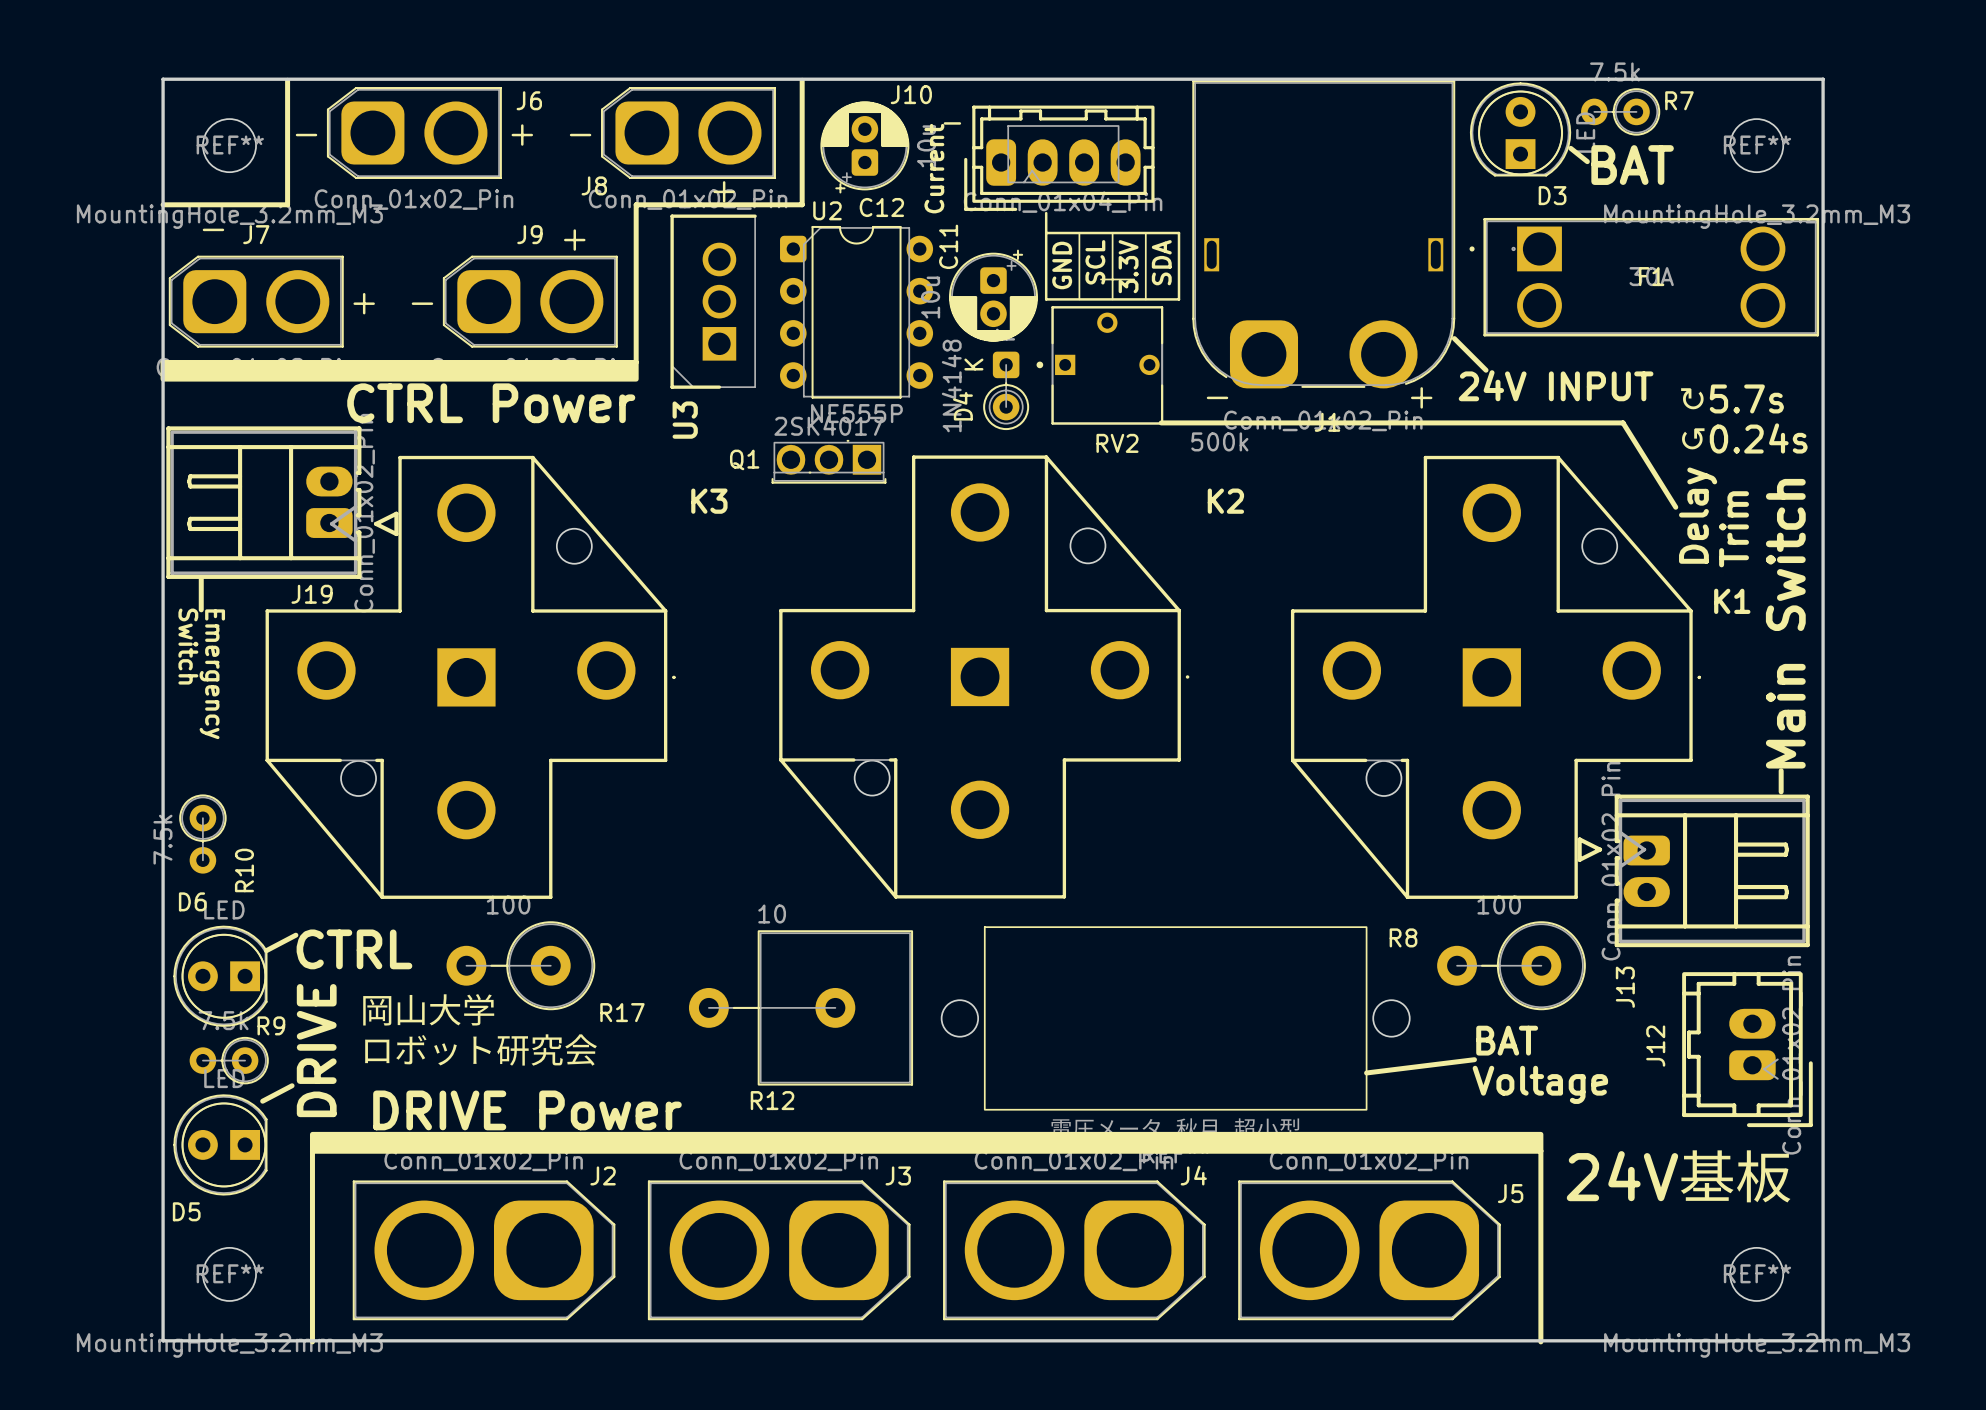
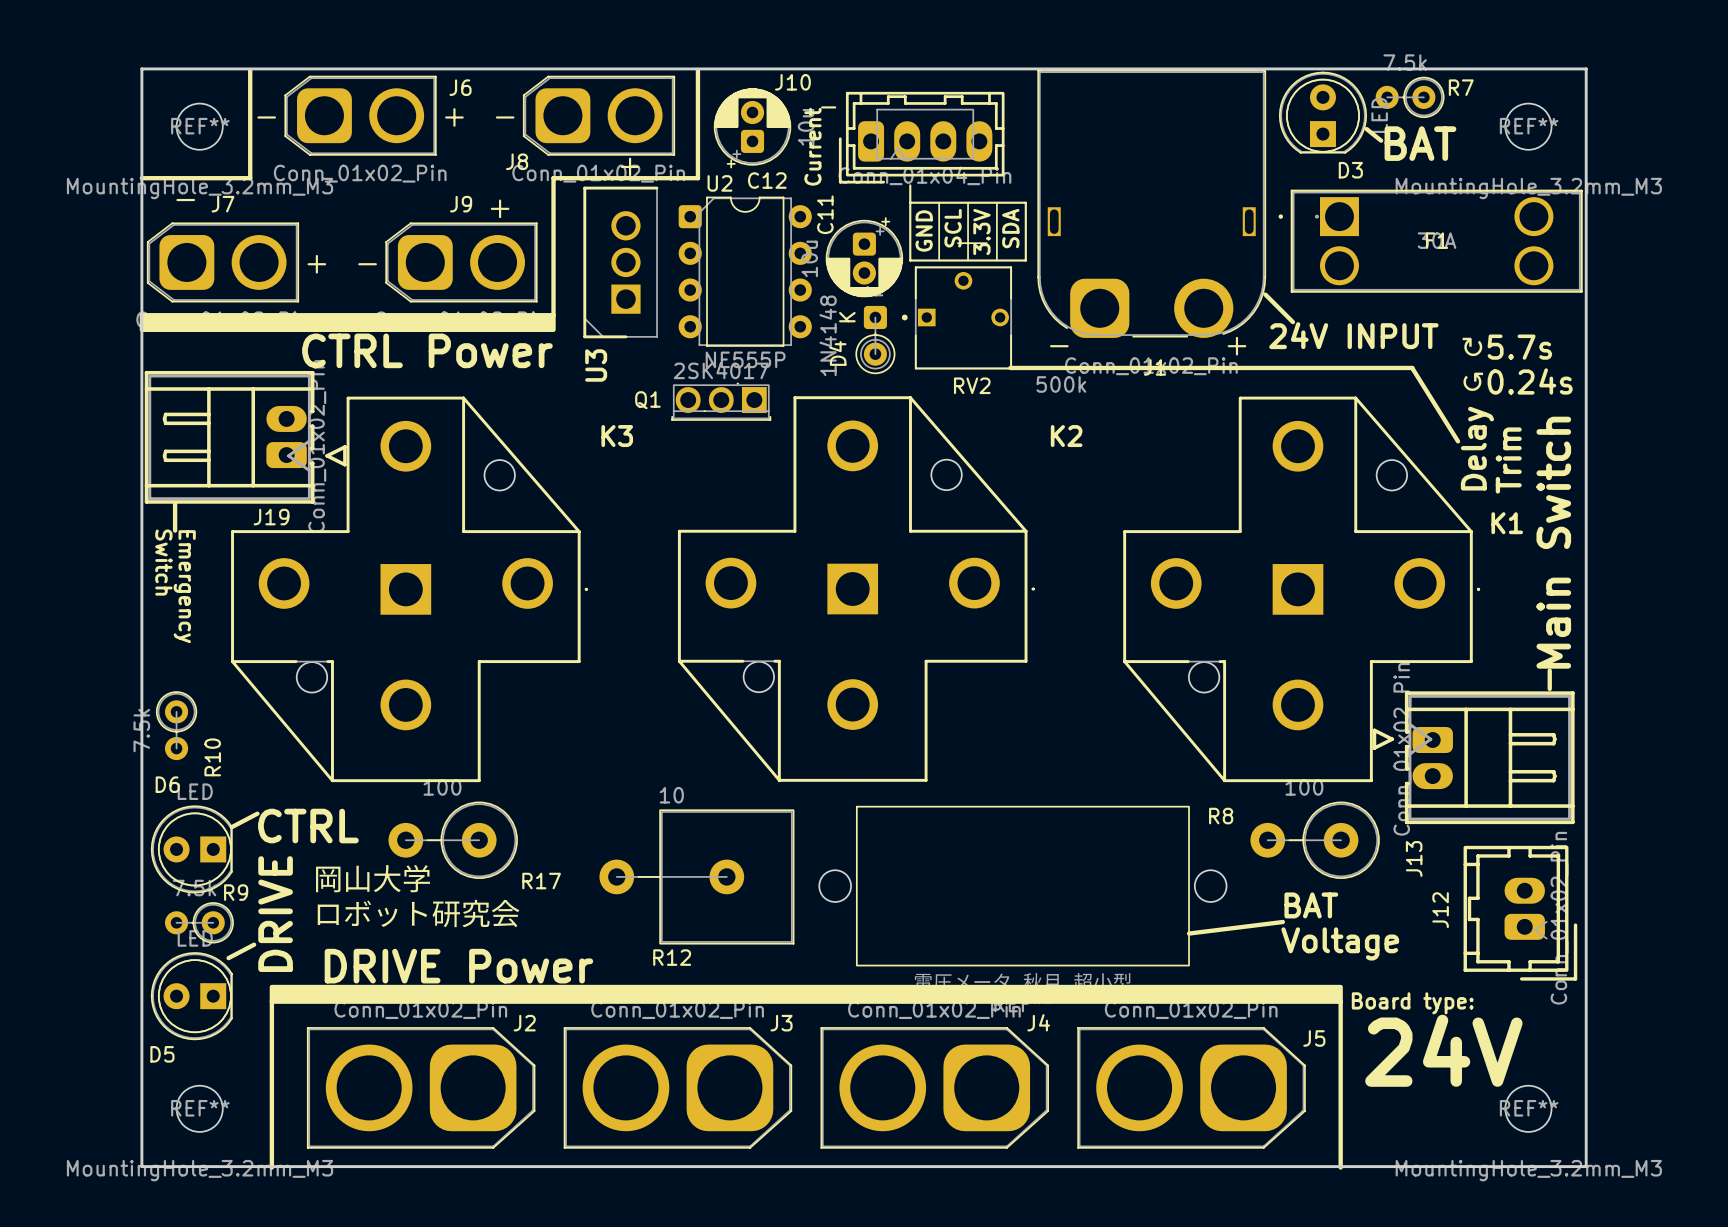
text: none -> Board type: (1412, 1003)
text: 24V基板 (1680, 1176) -> 24V (1443, 1050)

